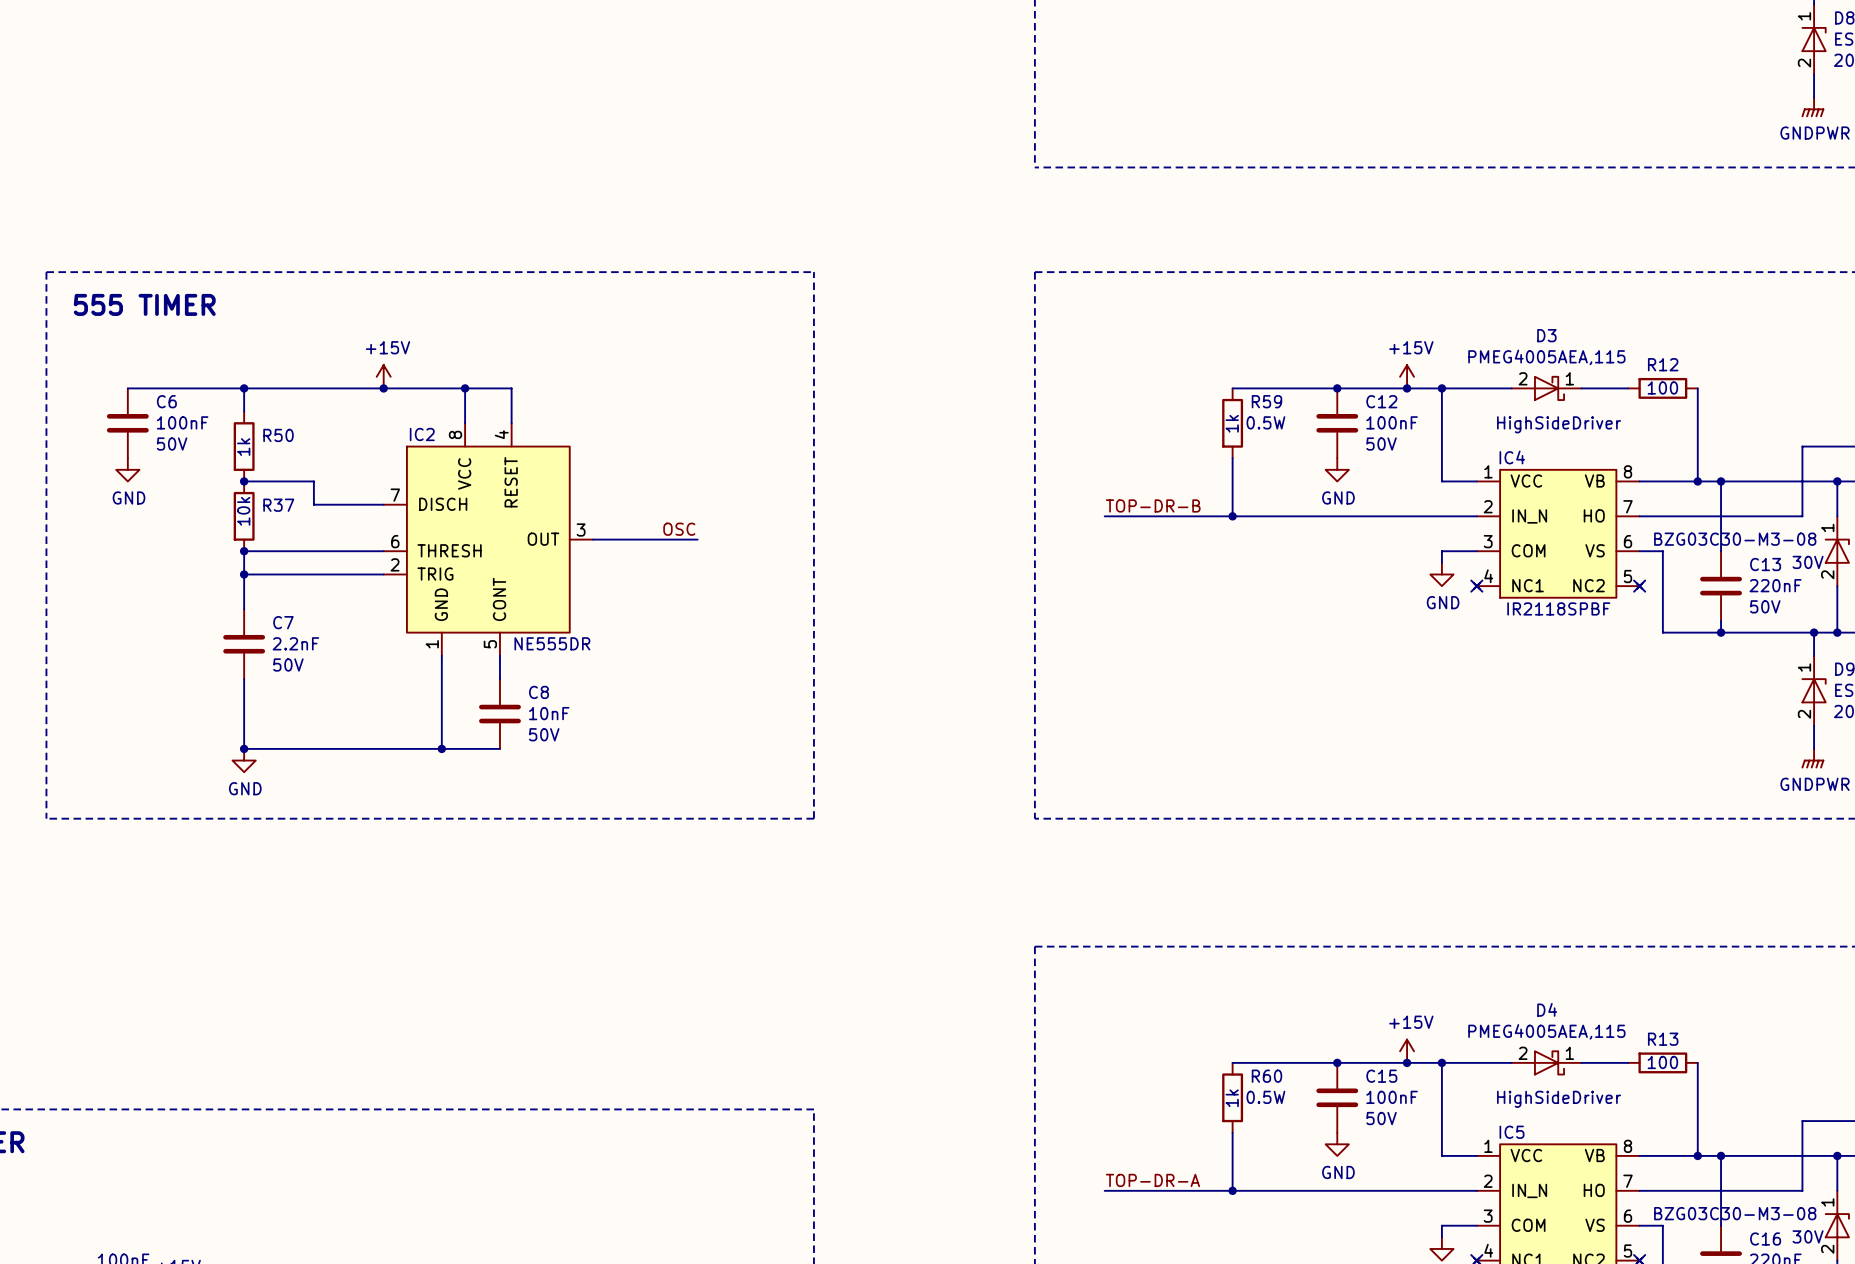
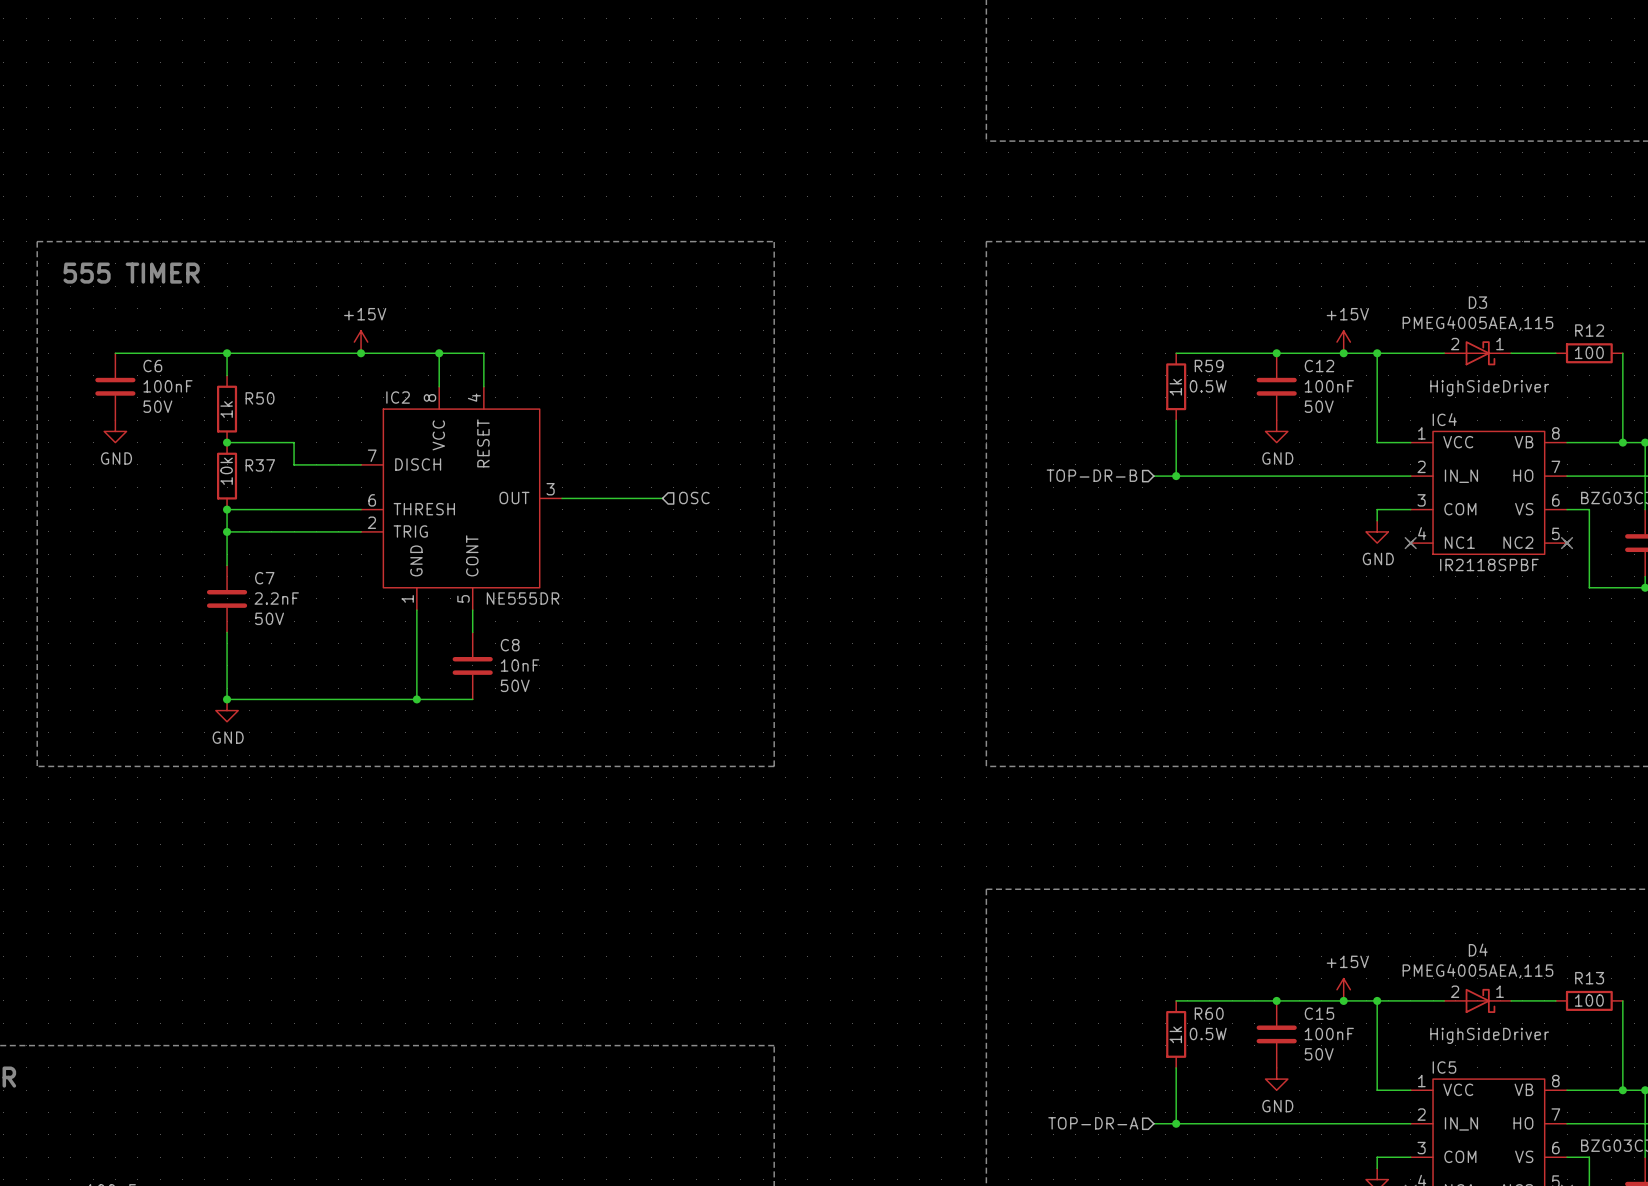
label: TOP-DR-B (1153, 505) -> none
hierarchical label: none -> TOP-DR-B (1092, 475)
wire: (1104, 516) (1209, 516) -> none
label: OSC (679, 529) -> none
hierarchical label: none -> OSC (694, 498)
label: TOP-DR-A (1152, 1180) -> none
wire: (1104, 1190) (1209, 1190) -> none
hierarchical label: none -> TOP-DR-A (1093, 1123)

